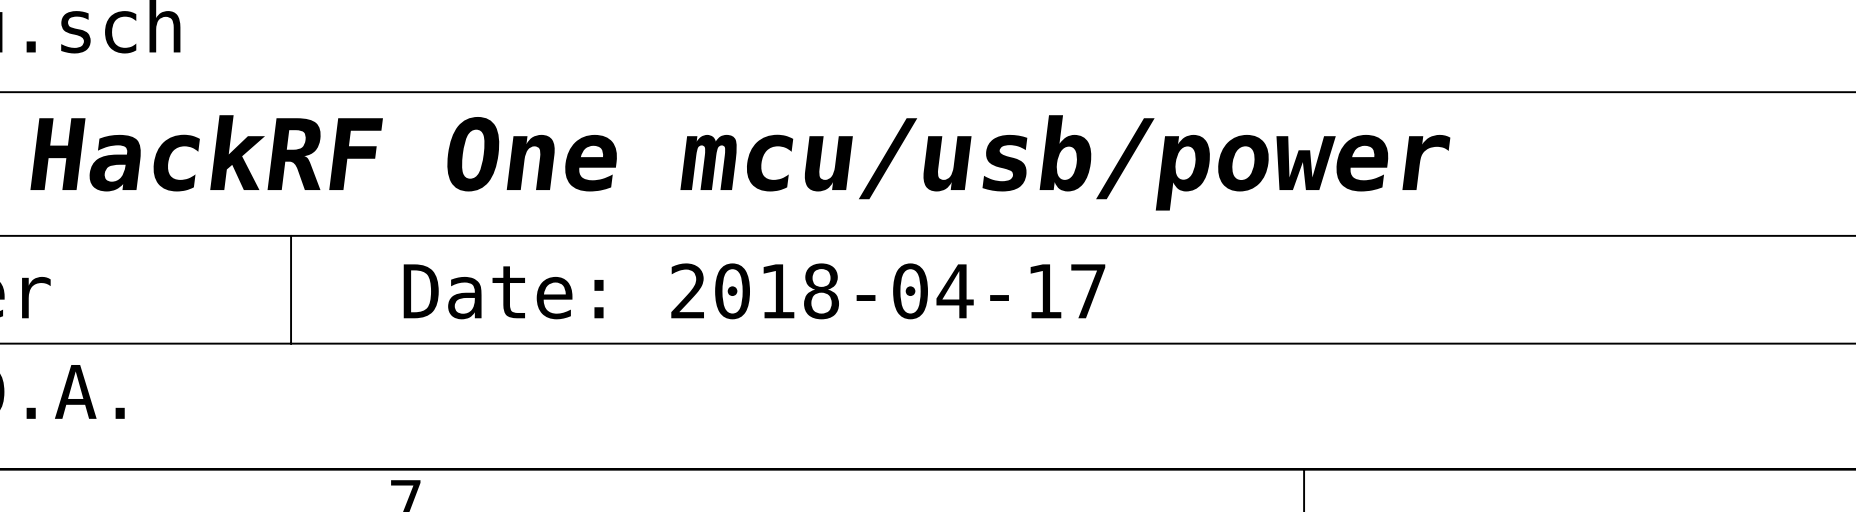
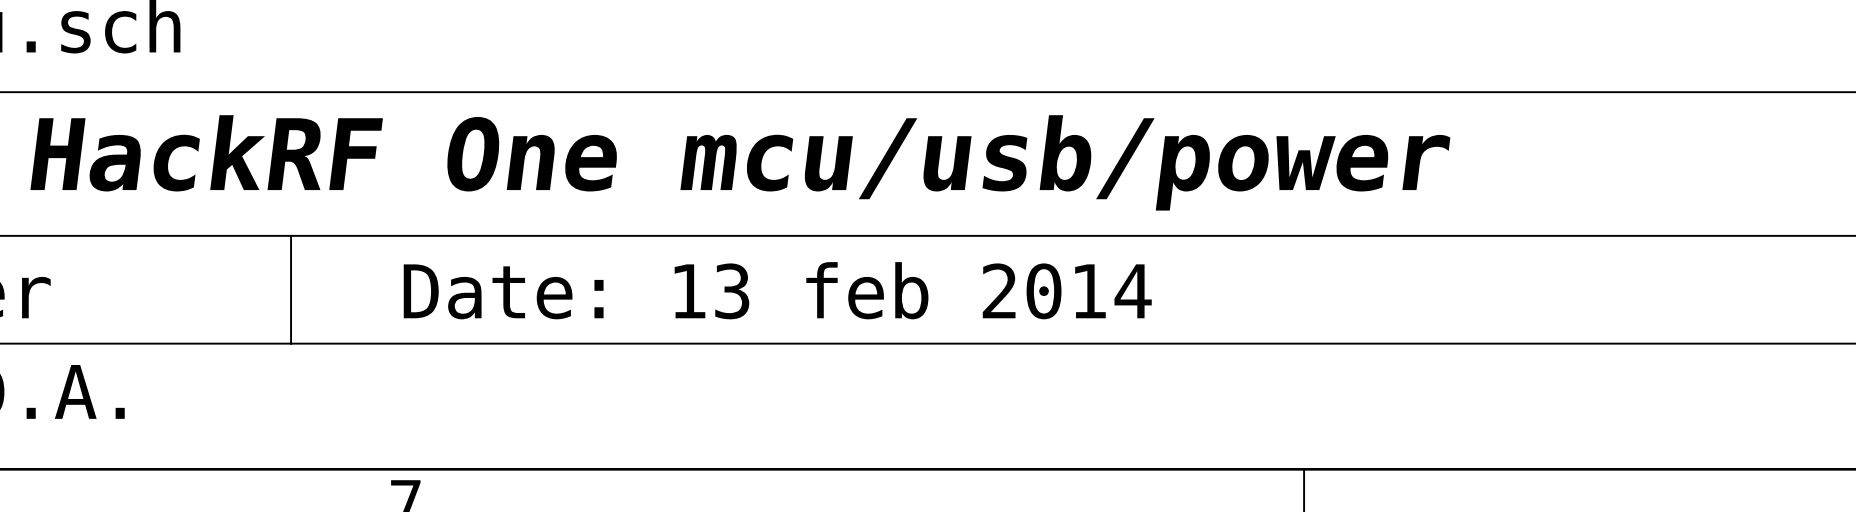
title block: Date: 2018-04-17 (754, 291) -> Date: 13 feb 2014 (777, 290)

